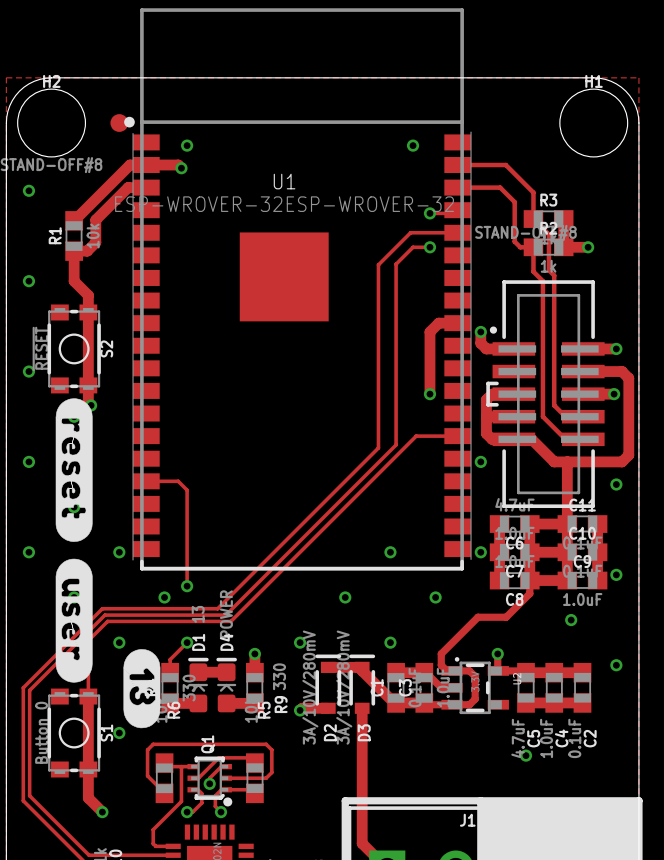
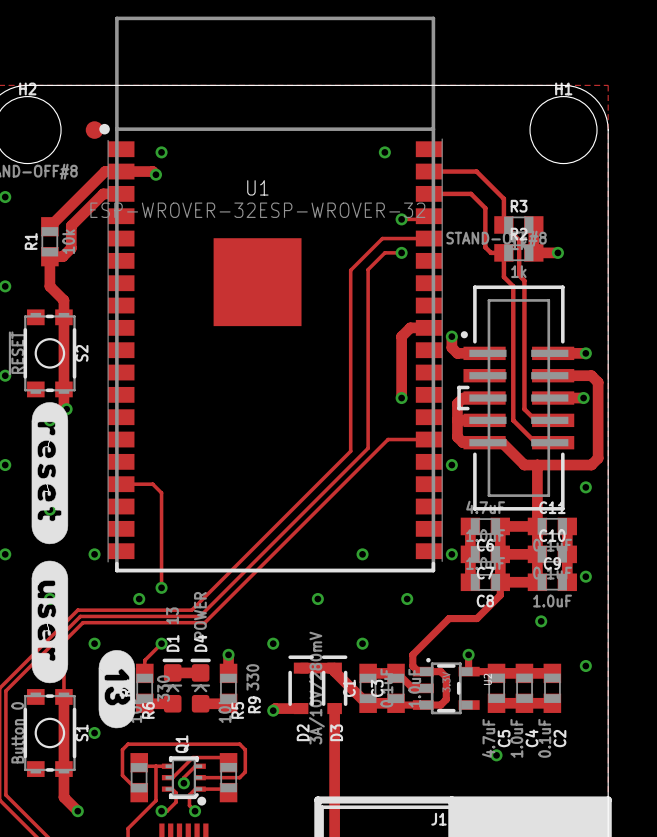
D2 value: 3A/10V/280mV (310, 687) -> none

